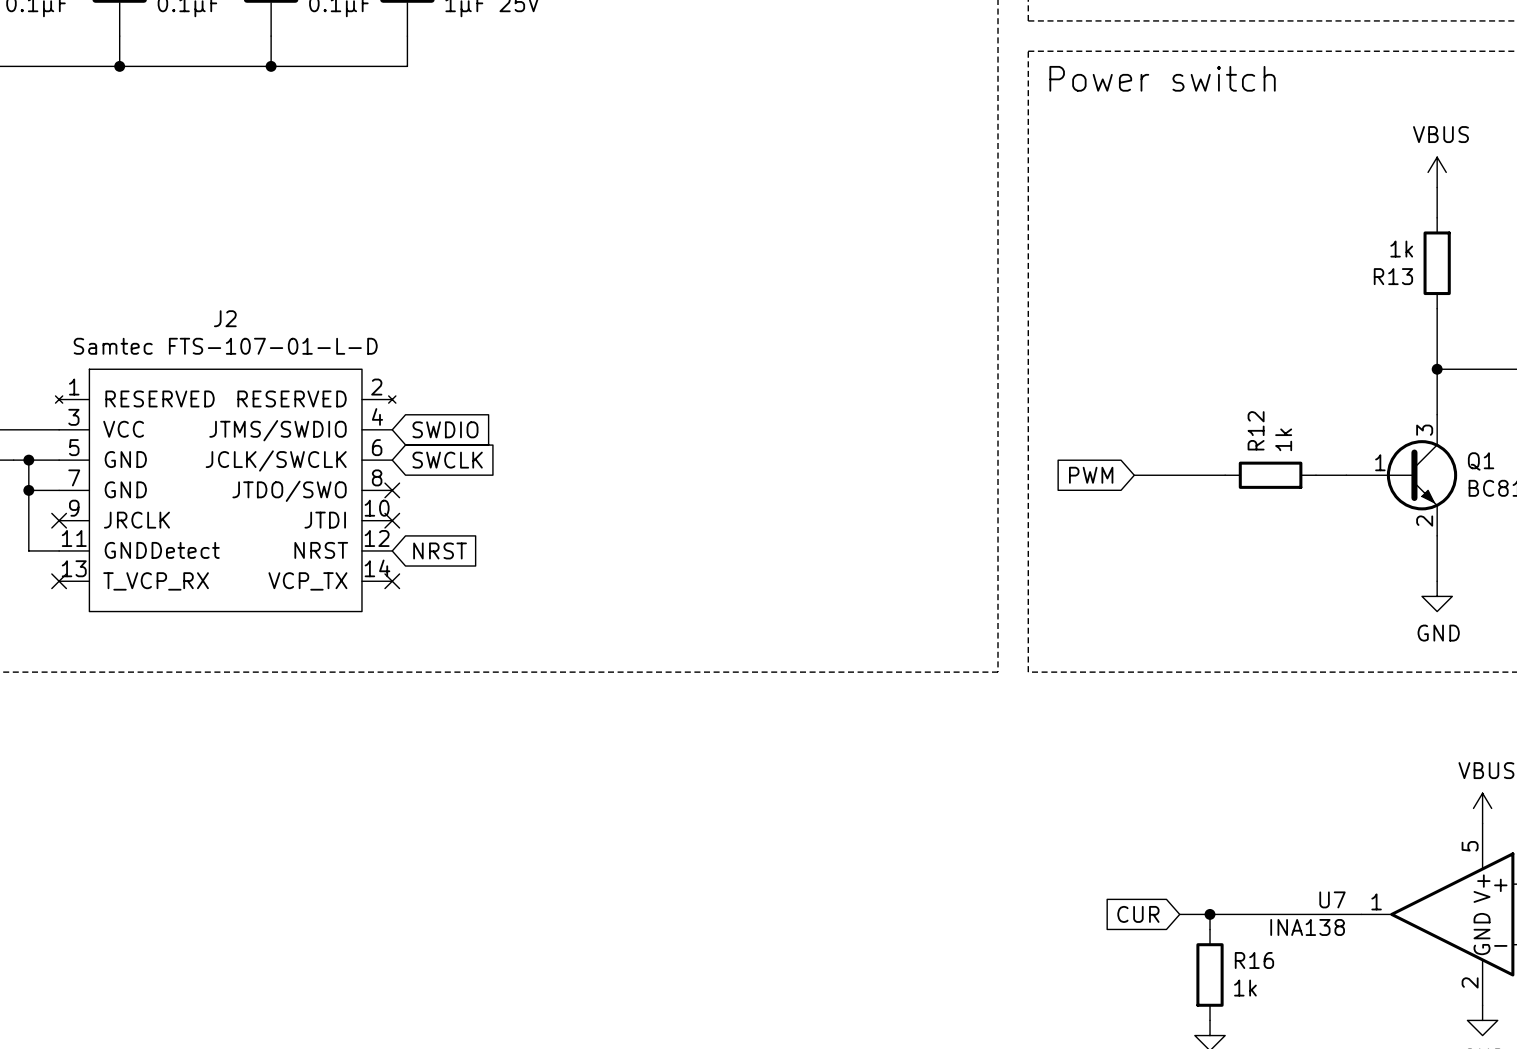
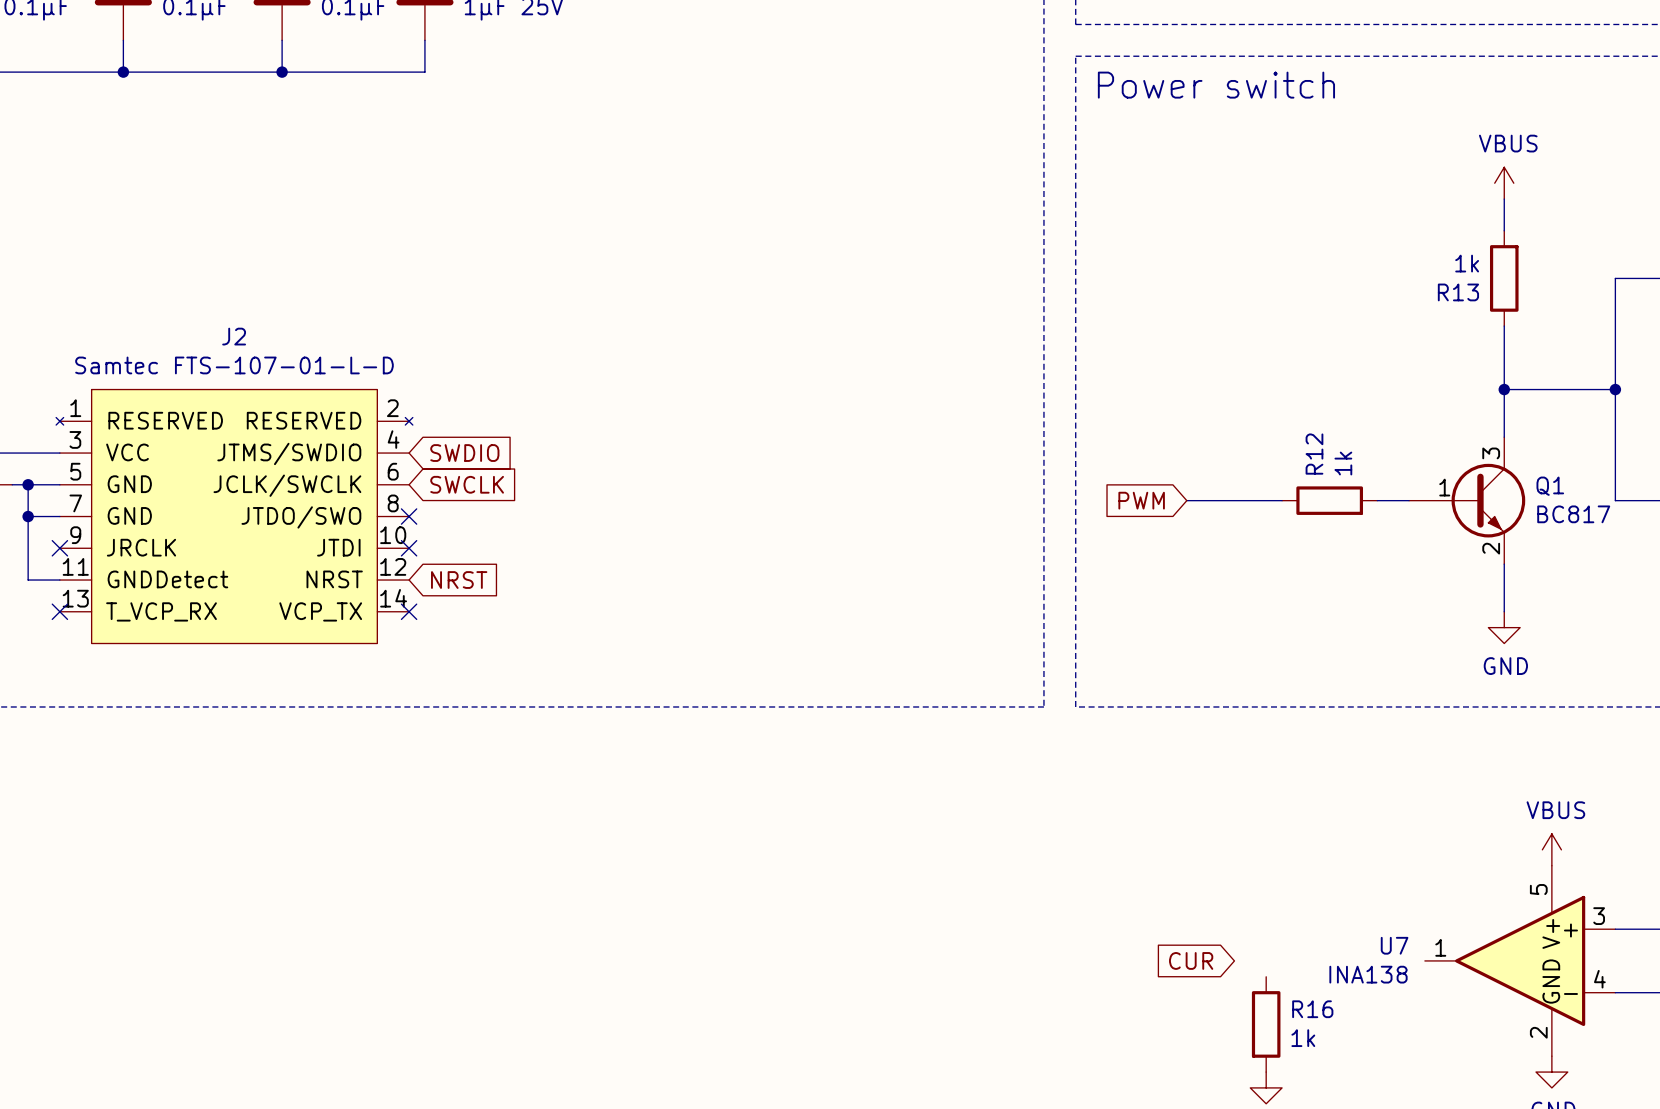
wire: (1179, 914) (1361, 914) -> none
wire: (1210, 914) (1210, 929) -> none
junction: (1210, 914) -> none

